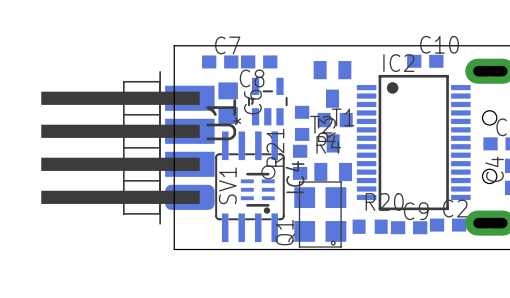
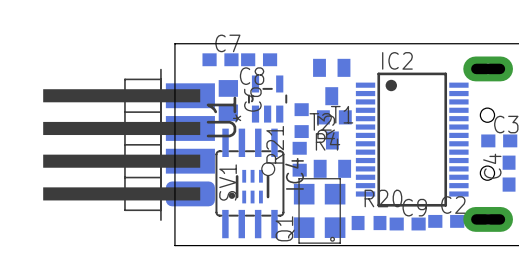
C10: (425, 61) -> none
part rotation: 0° (257, 193) -> 90° clockwise (249, 186)

